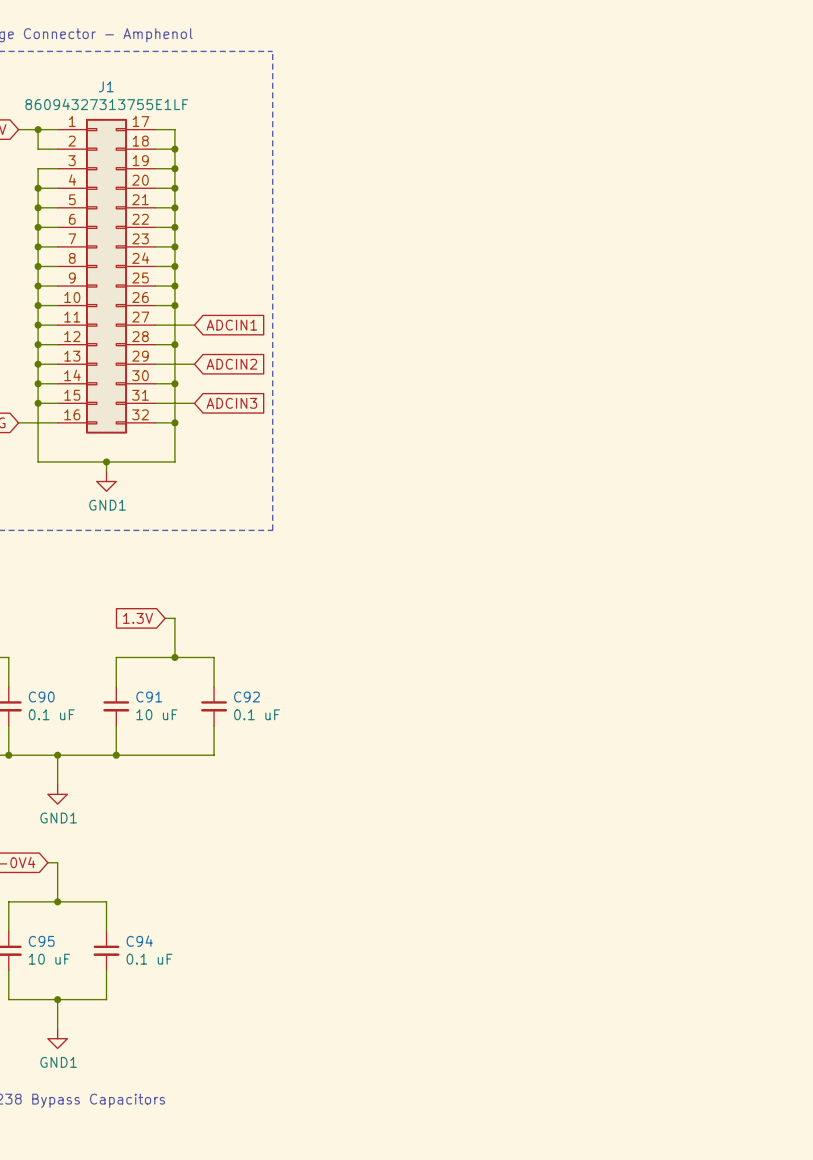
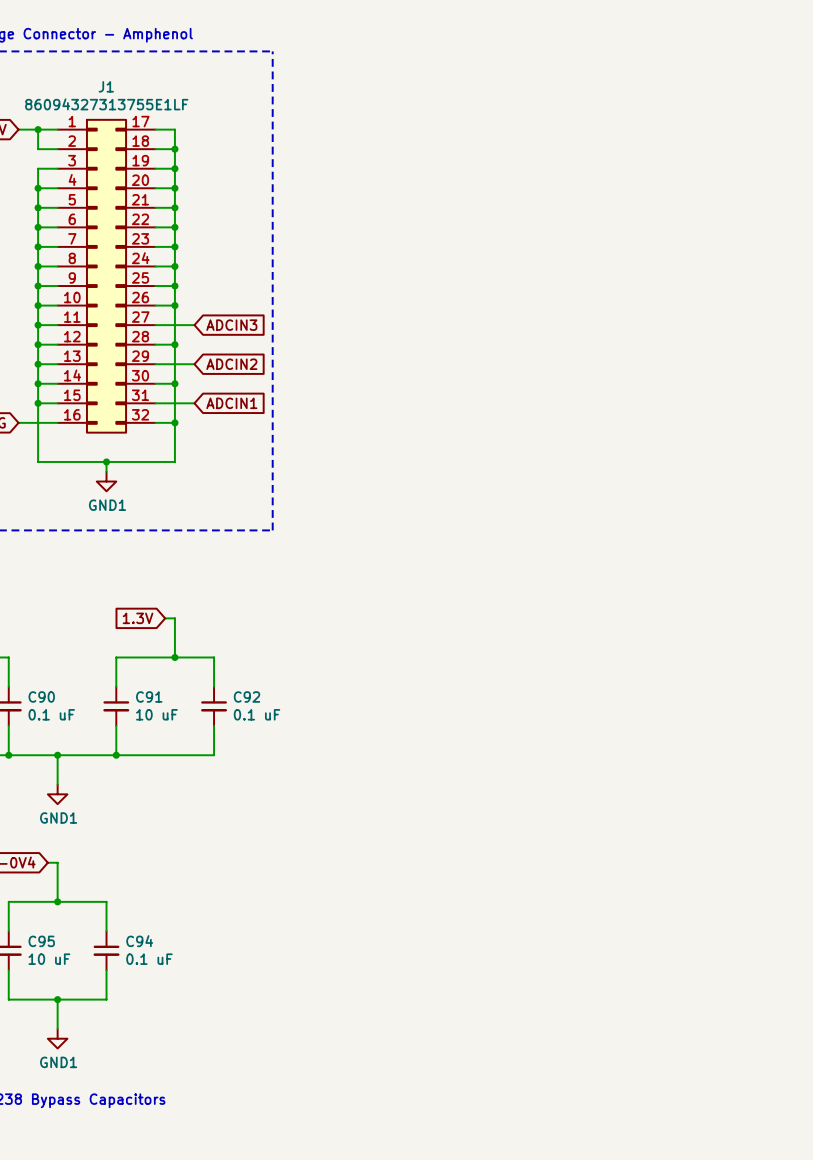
global label: ADCIN1 (231, 325) -> ADCIN3 (231, 325)
global label: ADCIN3 (231, 403) -> ADCIN1 (231, 403)

